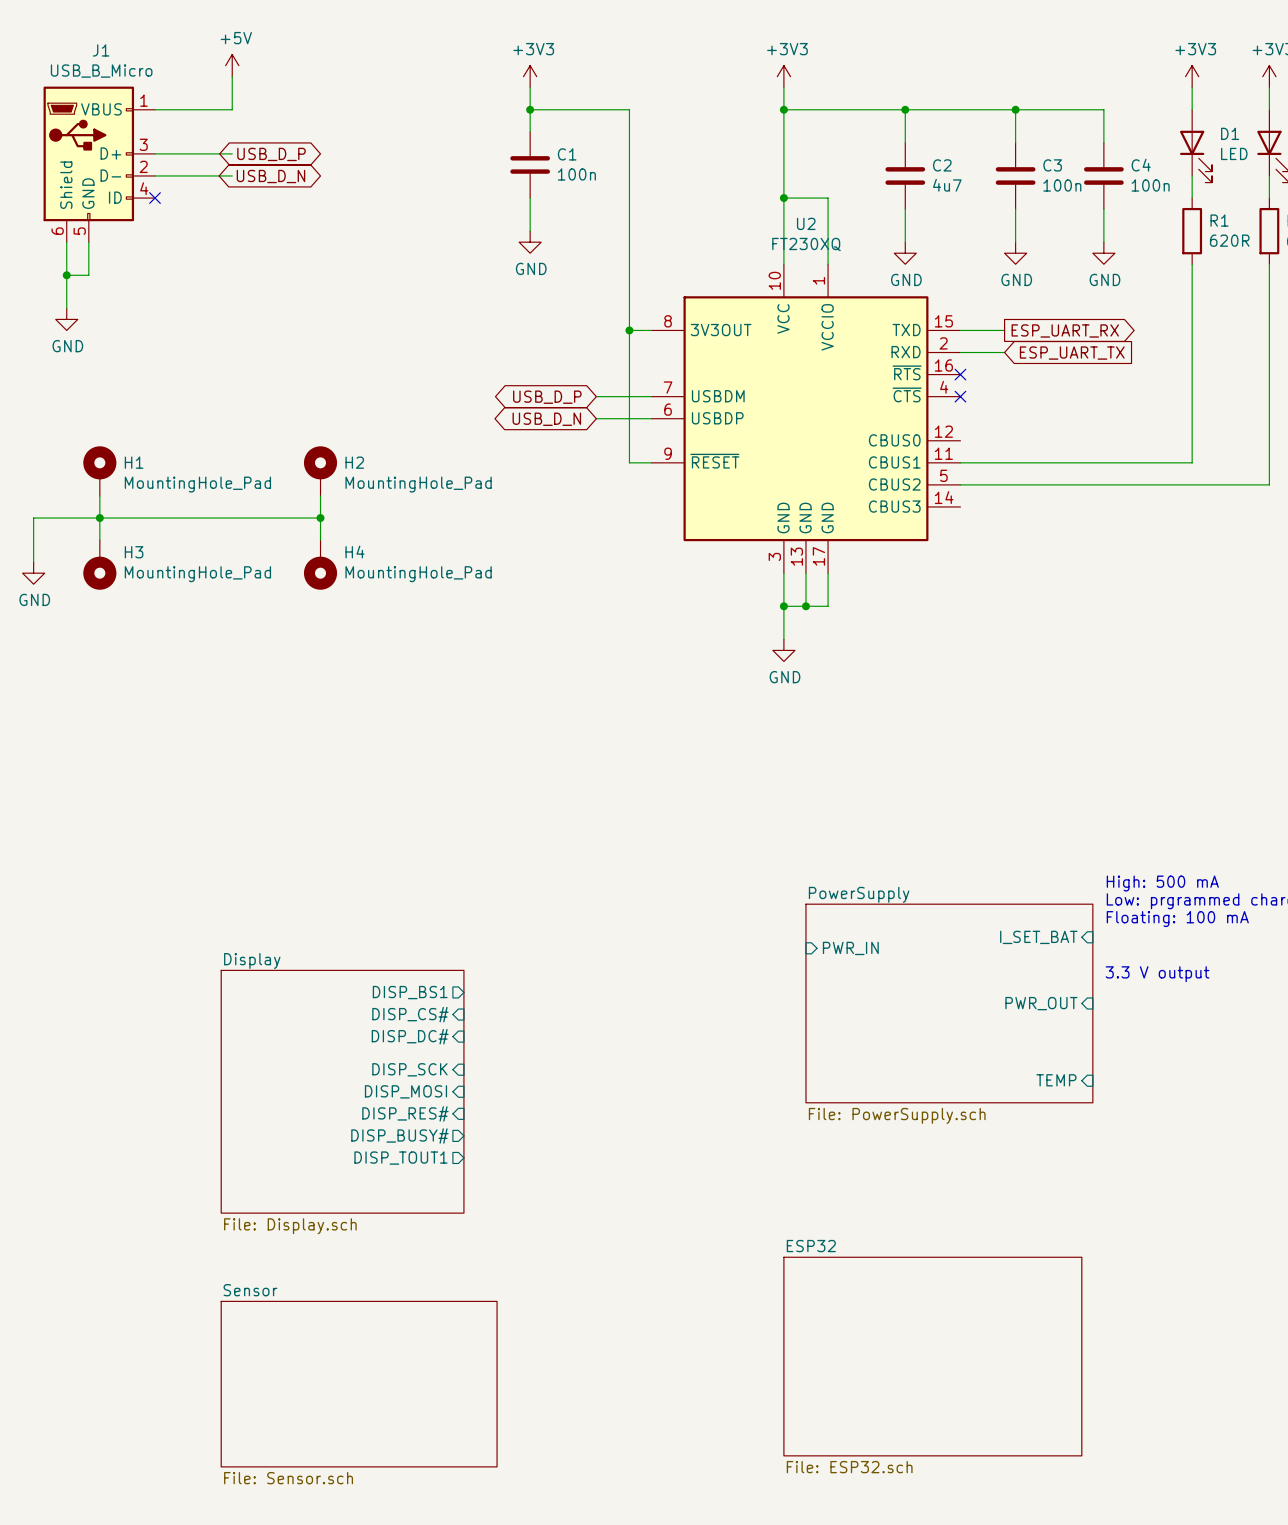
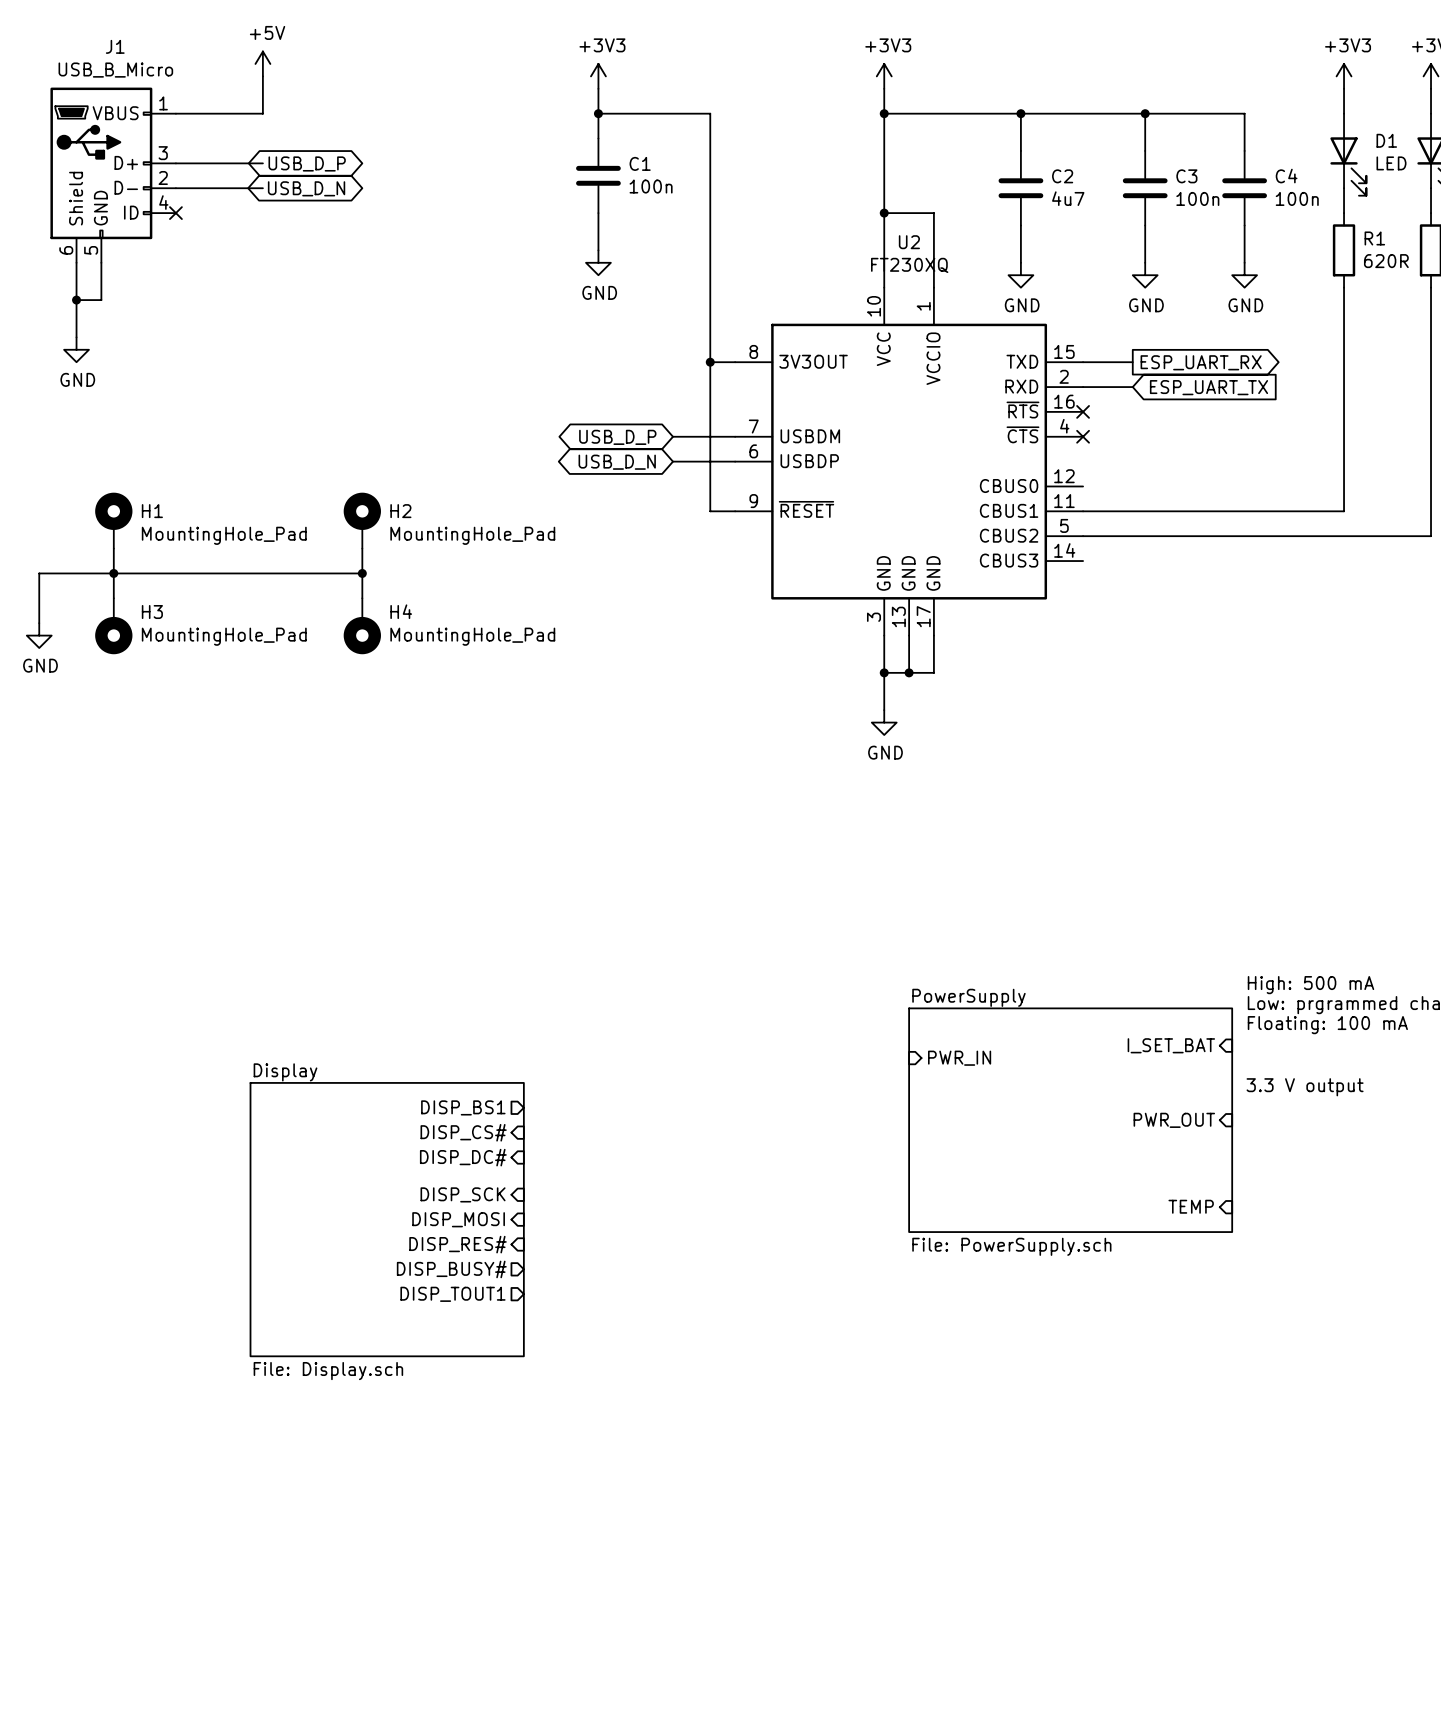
sheet ESP32: File: ESP32.sch (932, 1356) -> none
sheet Sensor: File: Sensor.sch (359, 1384) -> none

